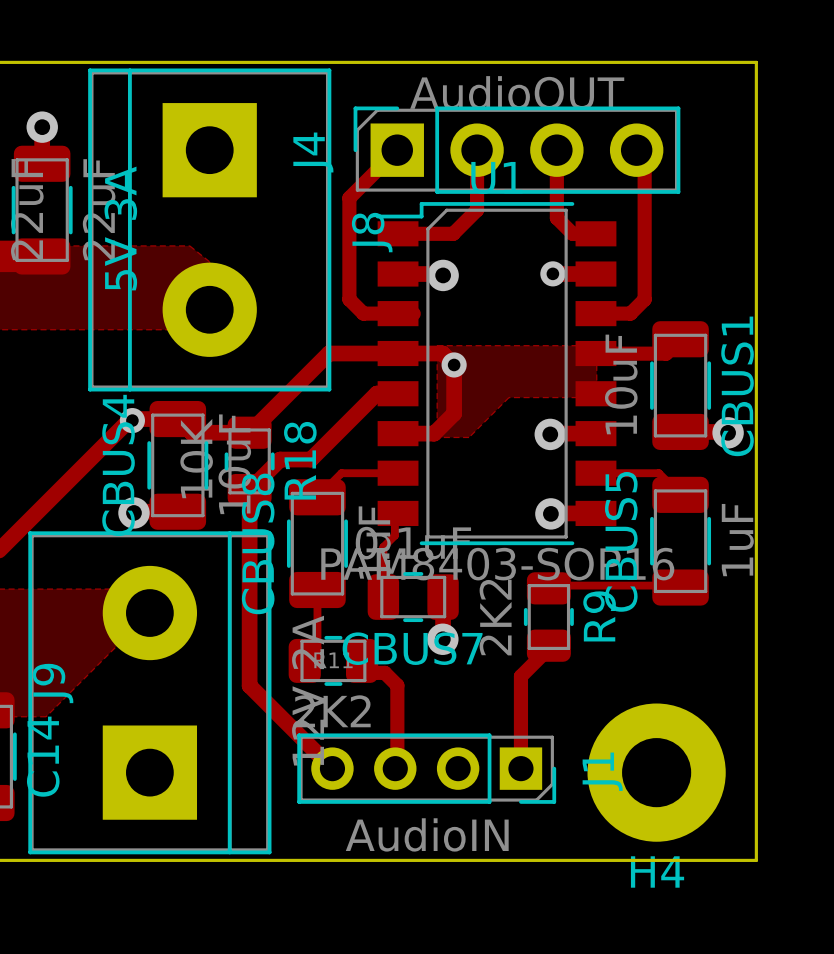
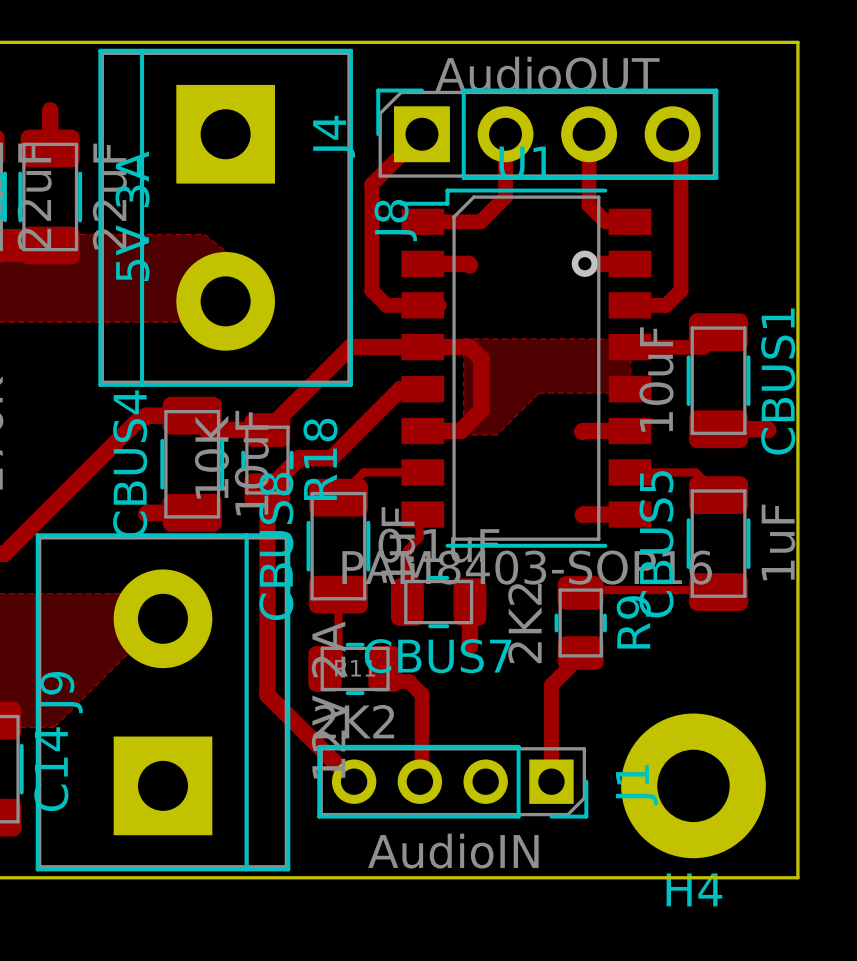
via: (42, 127) -> none
via: (443, 275) -> none
via: (454, 364) -> none
via: (132, 420) -> none
via: (728, 432) -> none
via: (550, 434) -> none
via: (133, 512) -> none
via: (550, 513) -> none
via: (442, 639) -> none

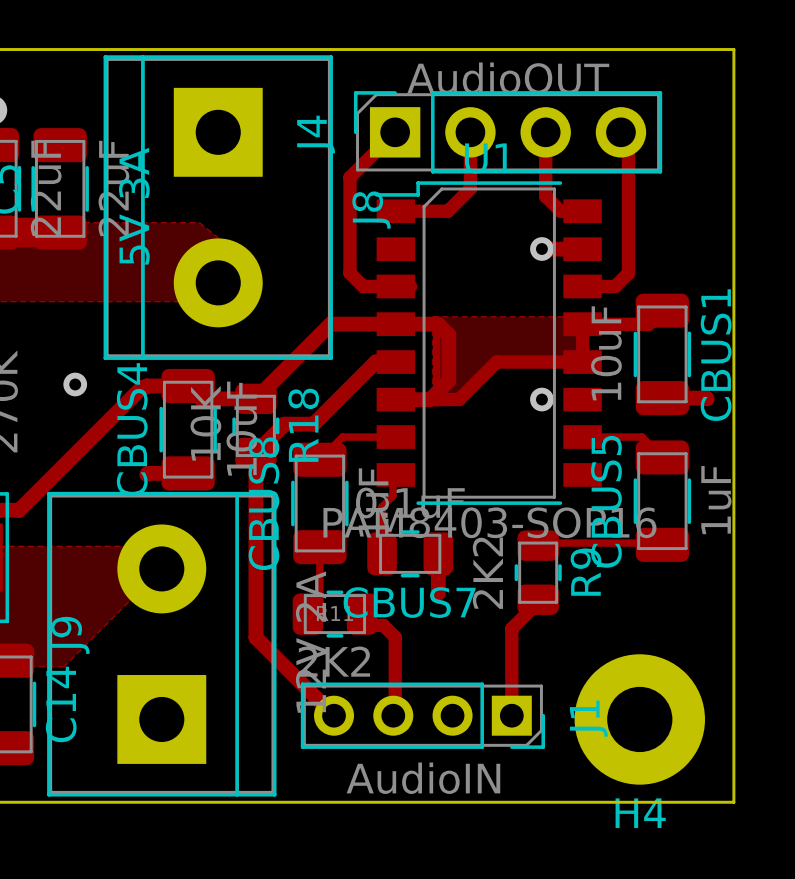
track: (50, 110) (50, 148) -> none
track: (422, 263) (470, 265) -> none
track: none -> (436, 324) (436, 397) (438, 399) (459, 399) (496, 362) (582, 362) (582, 324)
via: none -> (75, 384)
via: none -> (541, 399)
track: (630, 430) (582, 431) -> none
track: (630, 514) (582, 515) -> none

